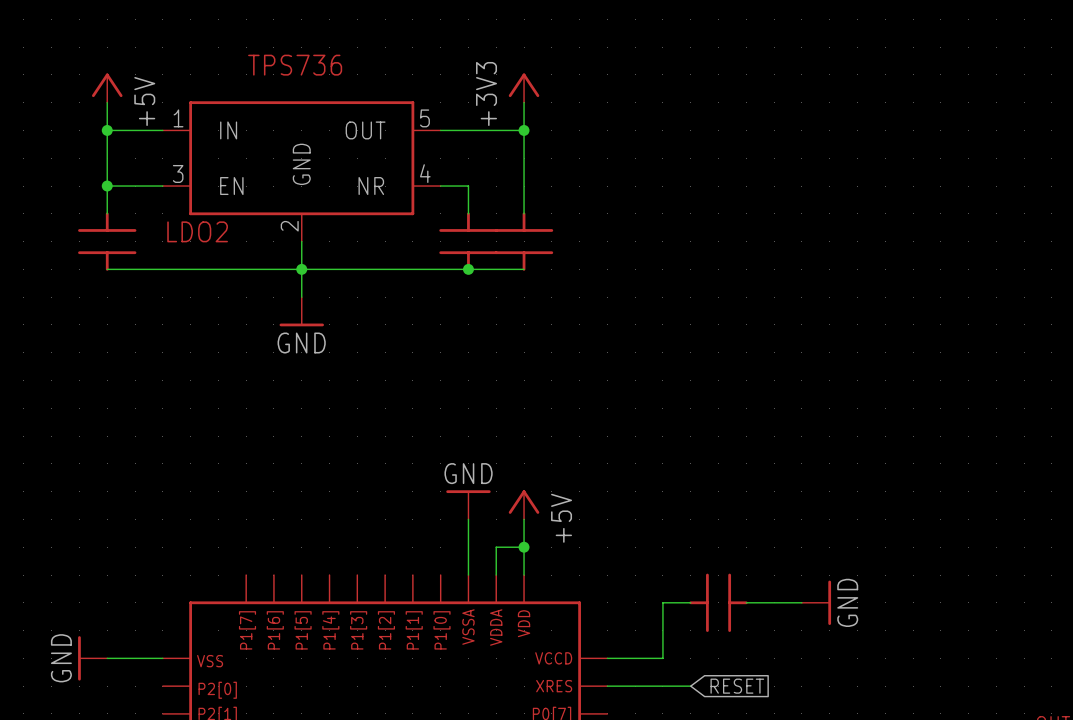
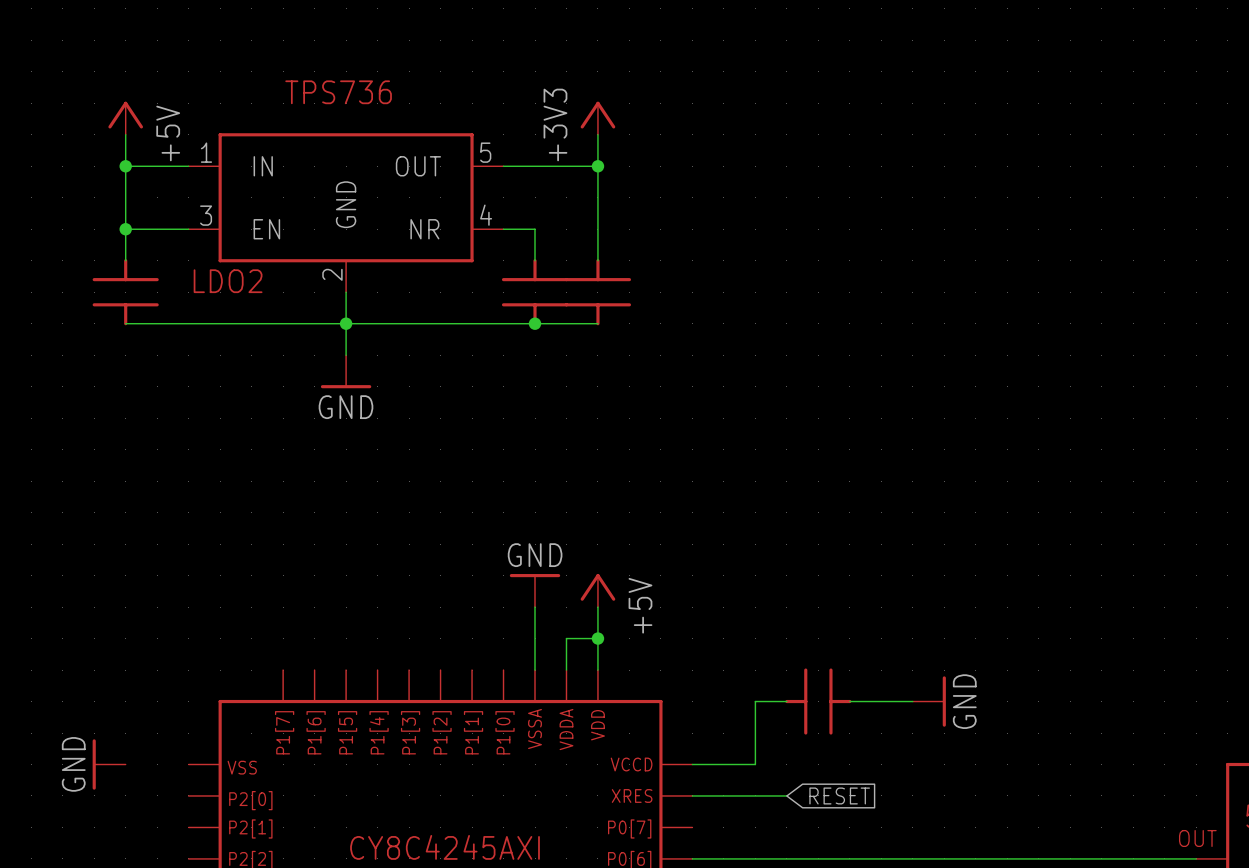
wire: (107, 658) (162, 658) -> none

